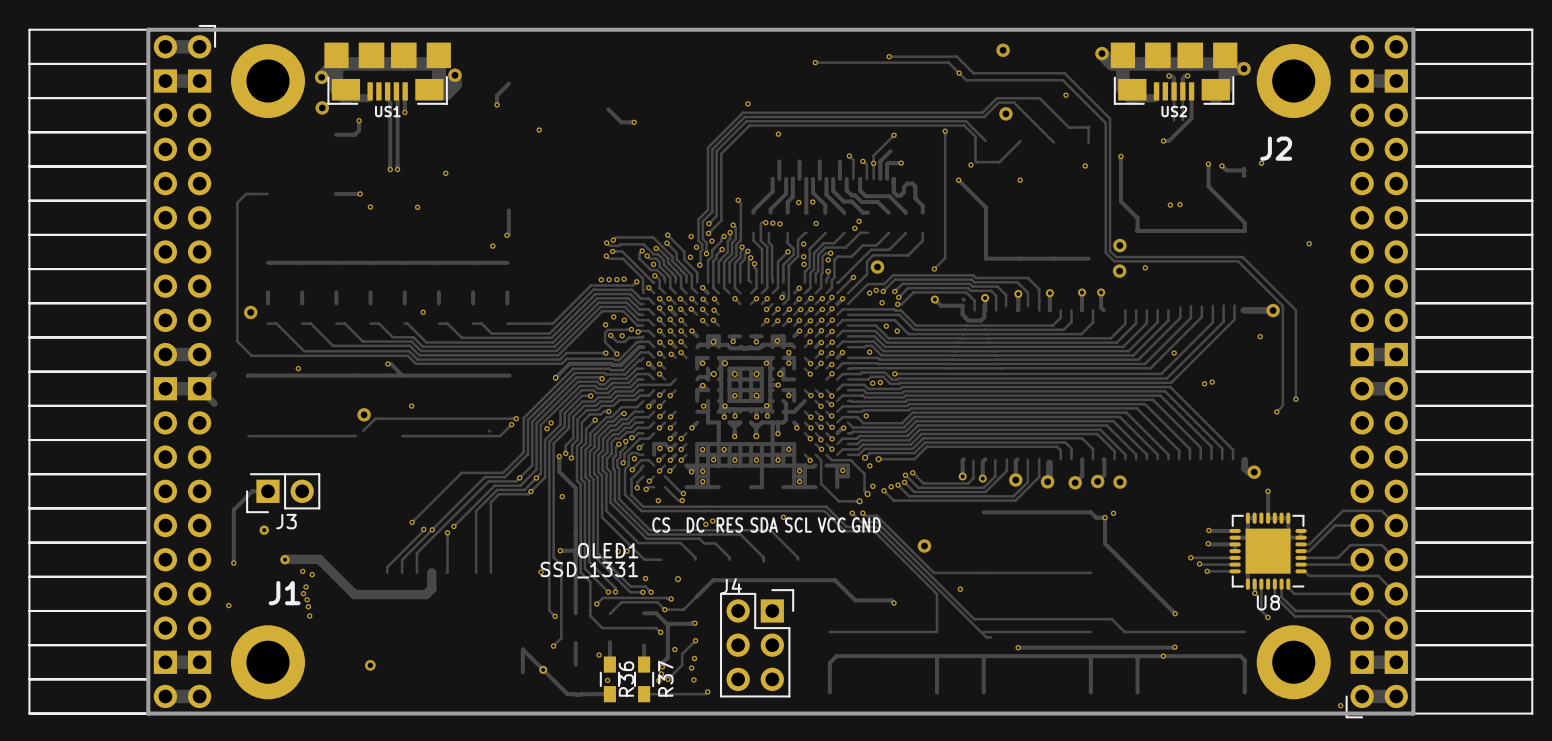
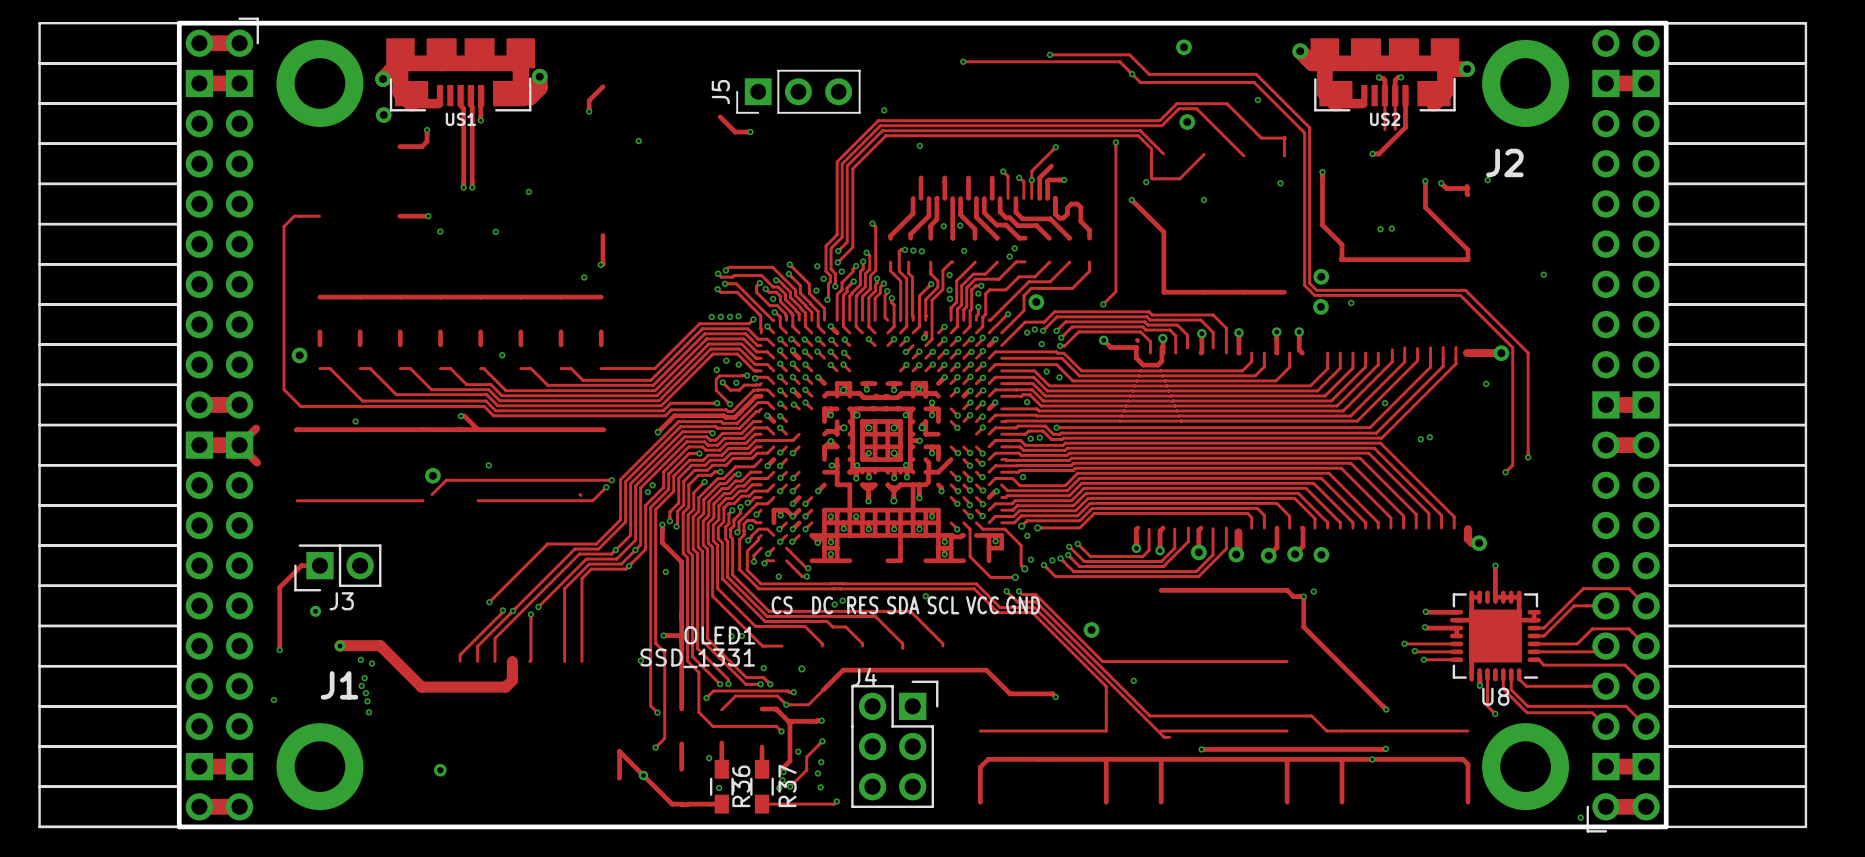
J5: none -> (798, 91)

